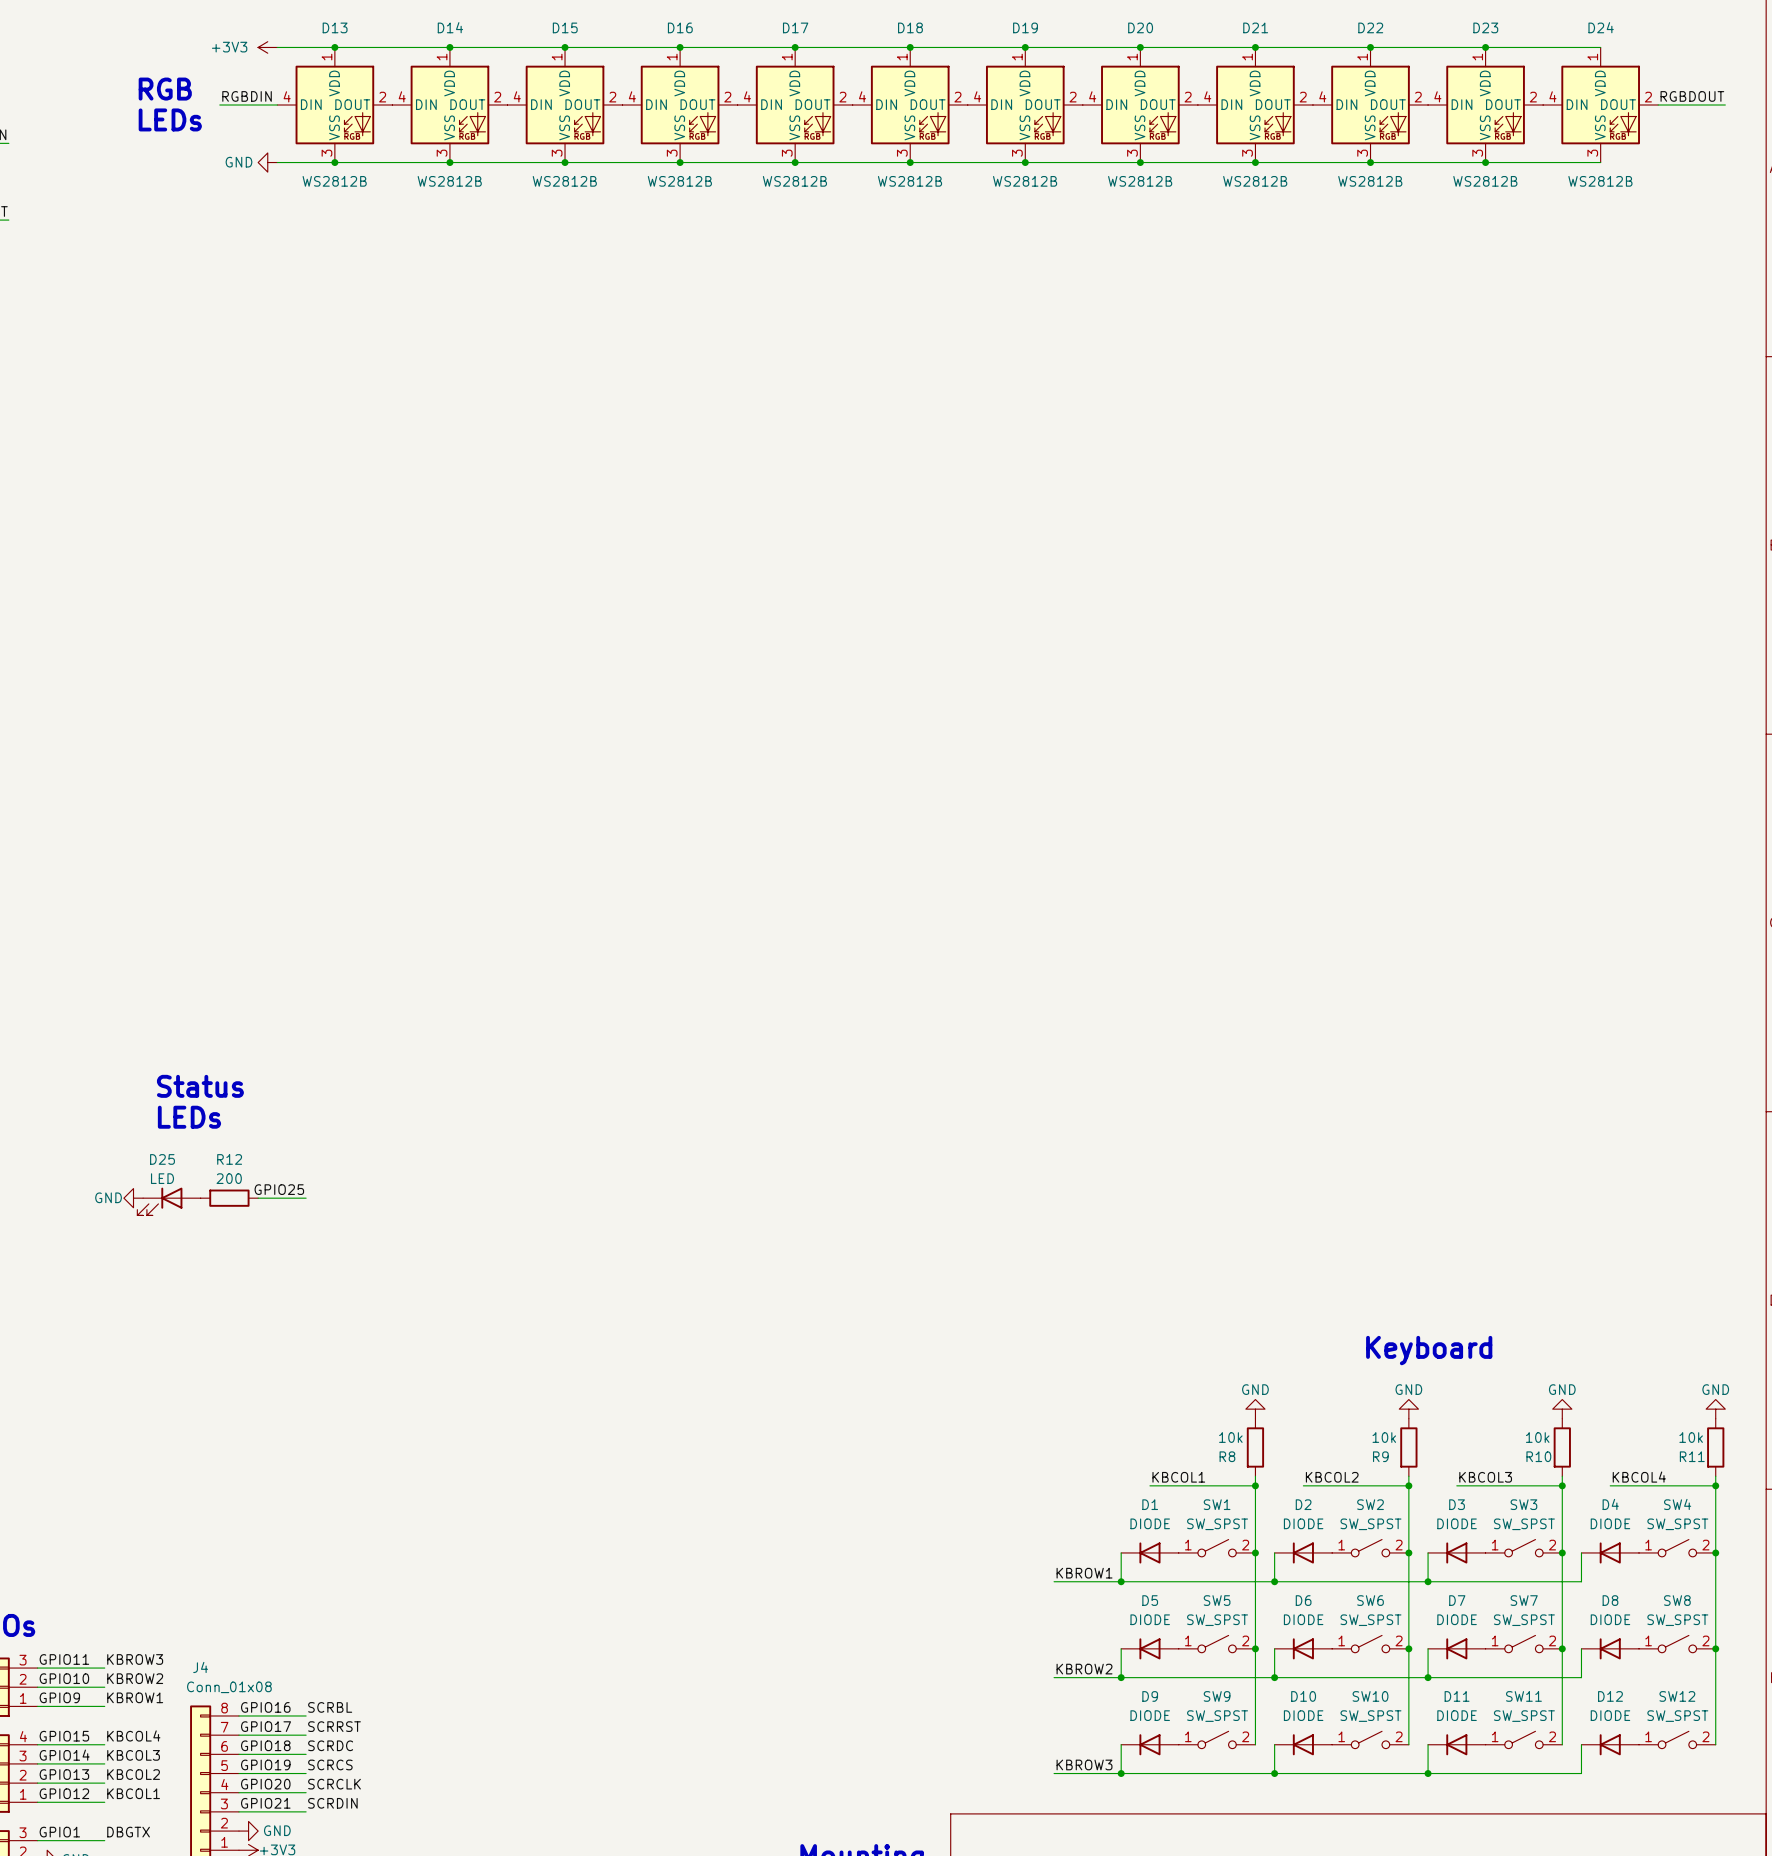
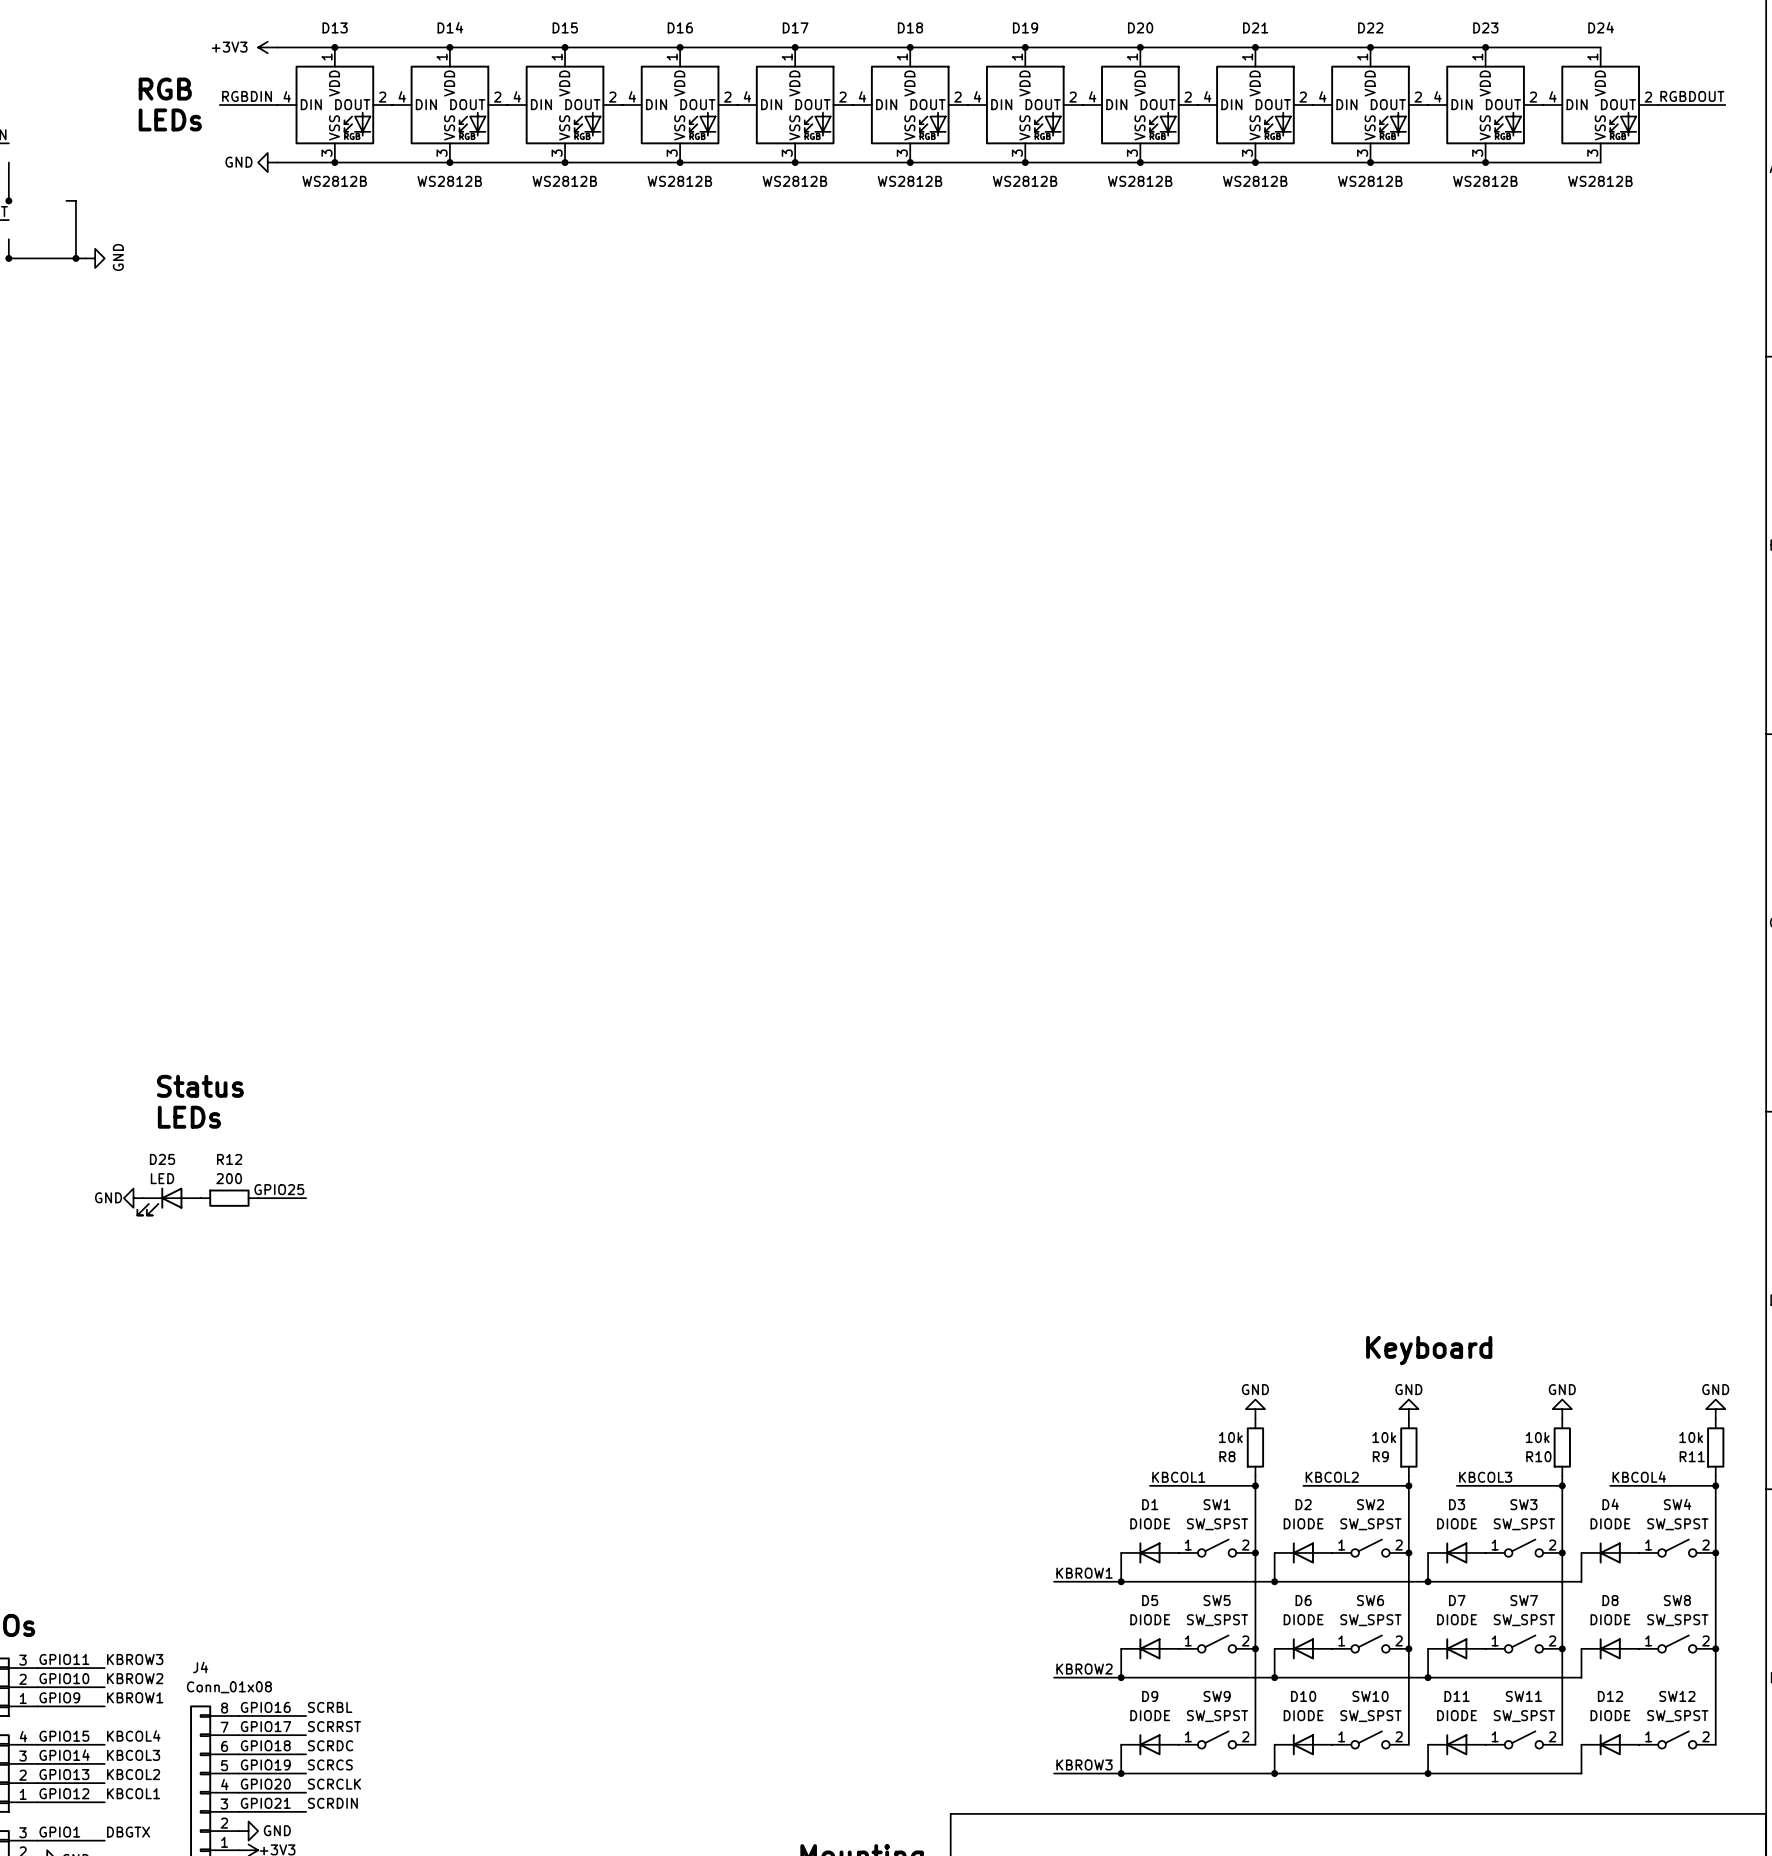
wire: none -> (8, 162) (8, 200)
junction: none -> (8, 200)
wire: none -> (66, 200) (75, 200) (75, 258)
wire: none -> (8, 239) (8, 258) (85, 258)
junction: none -> (8, 258)
junction: none -> (75, 258)
power symbol: none -> GND (95, 258)

